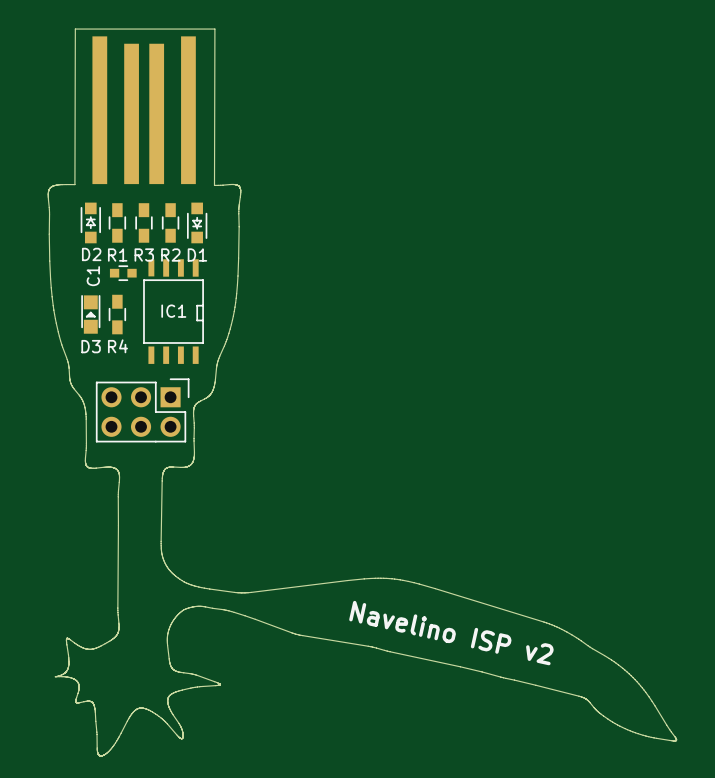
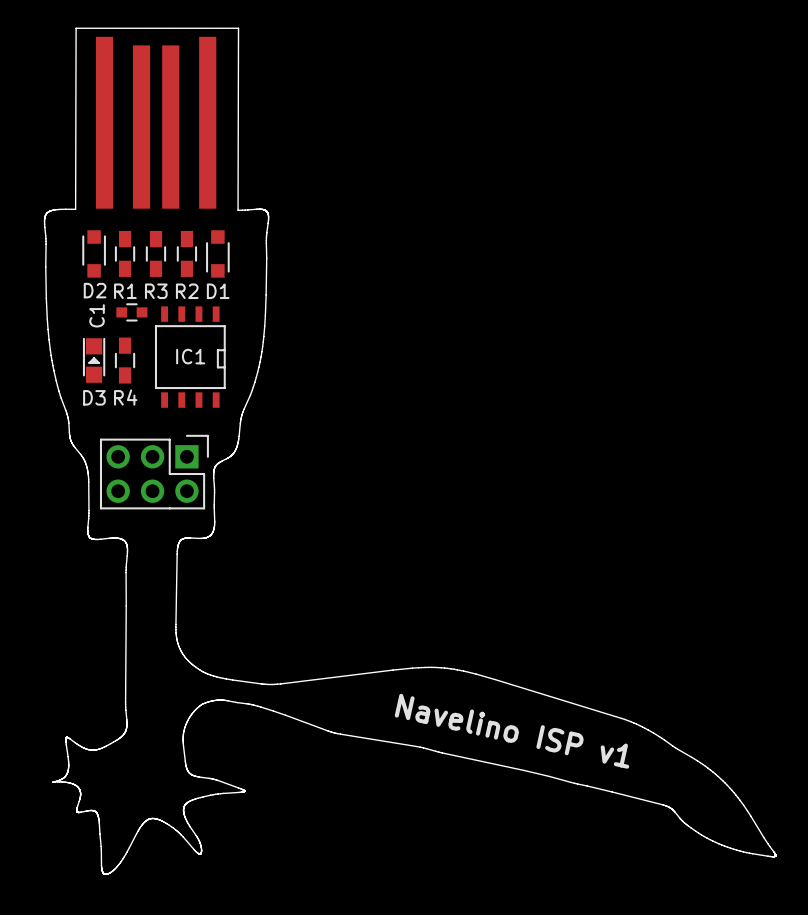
D2 footprint: [80, 202, 101, 244] -> [82, 230, 106, 278]
D1 footprint: [186, 202, 208, 244] -> [206, 230, 230, 278]
IC1 footprint: [143, 259, 204, 364] -> [154, 306, 226, 408]
text: Navelino ISP v2 (451, 633) -> Navelino ISP v1 (512, 731)

